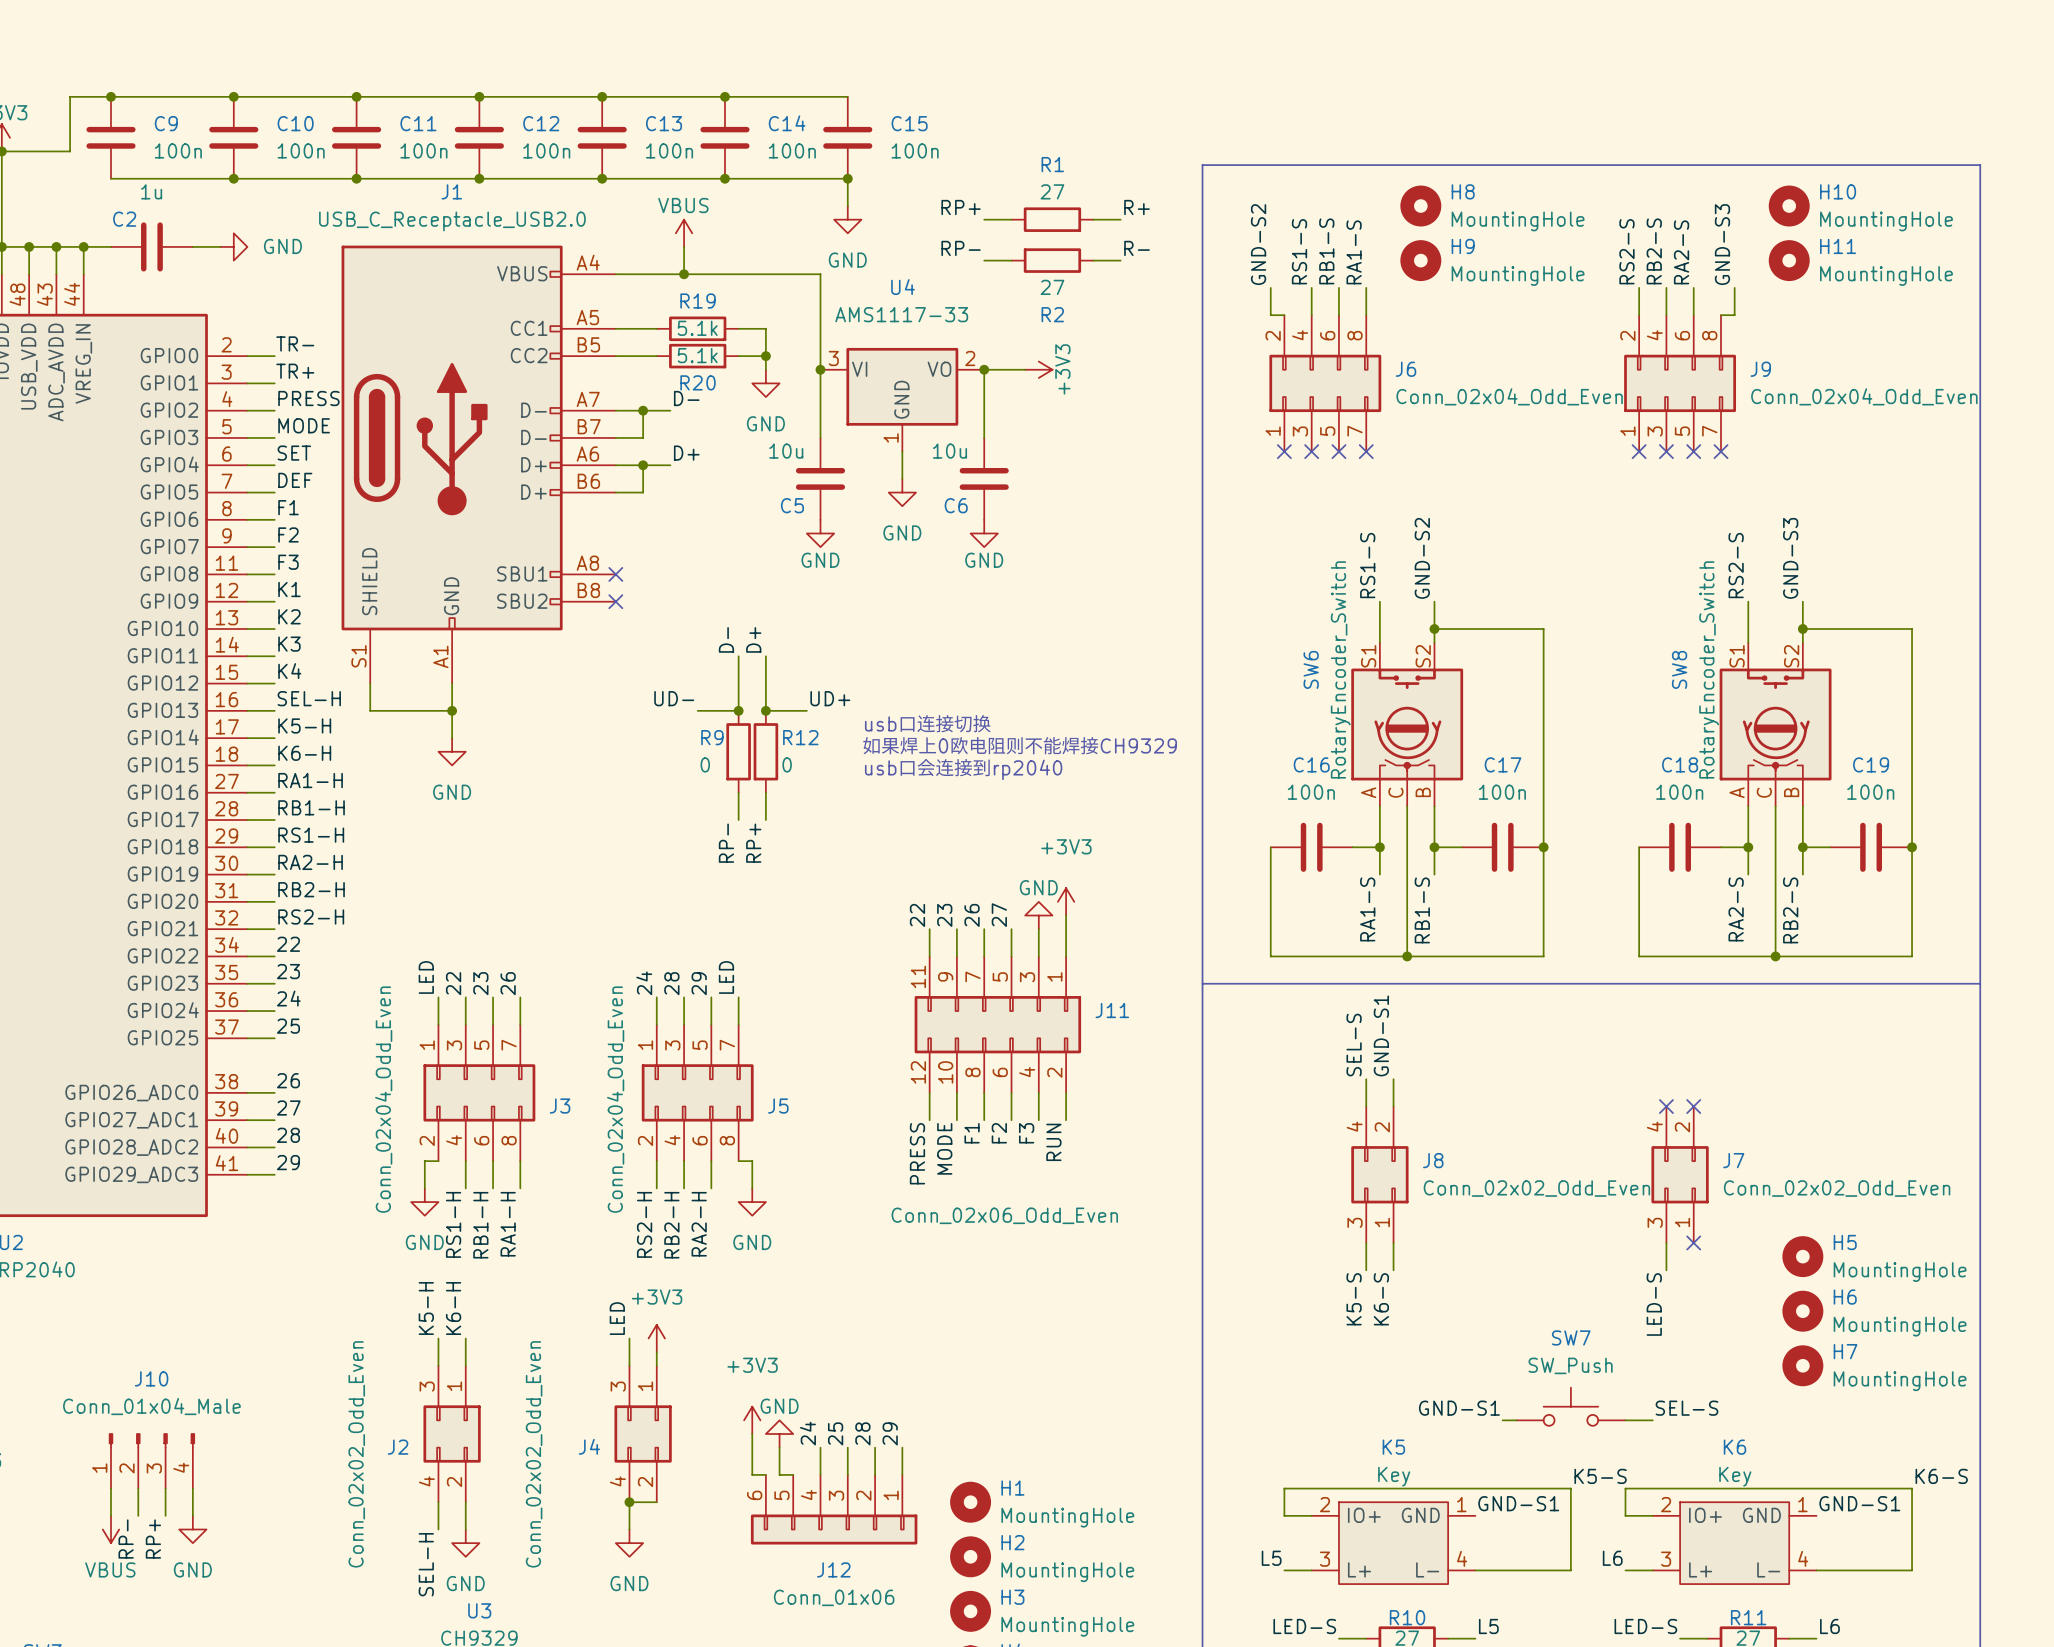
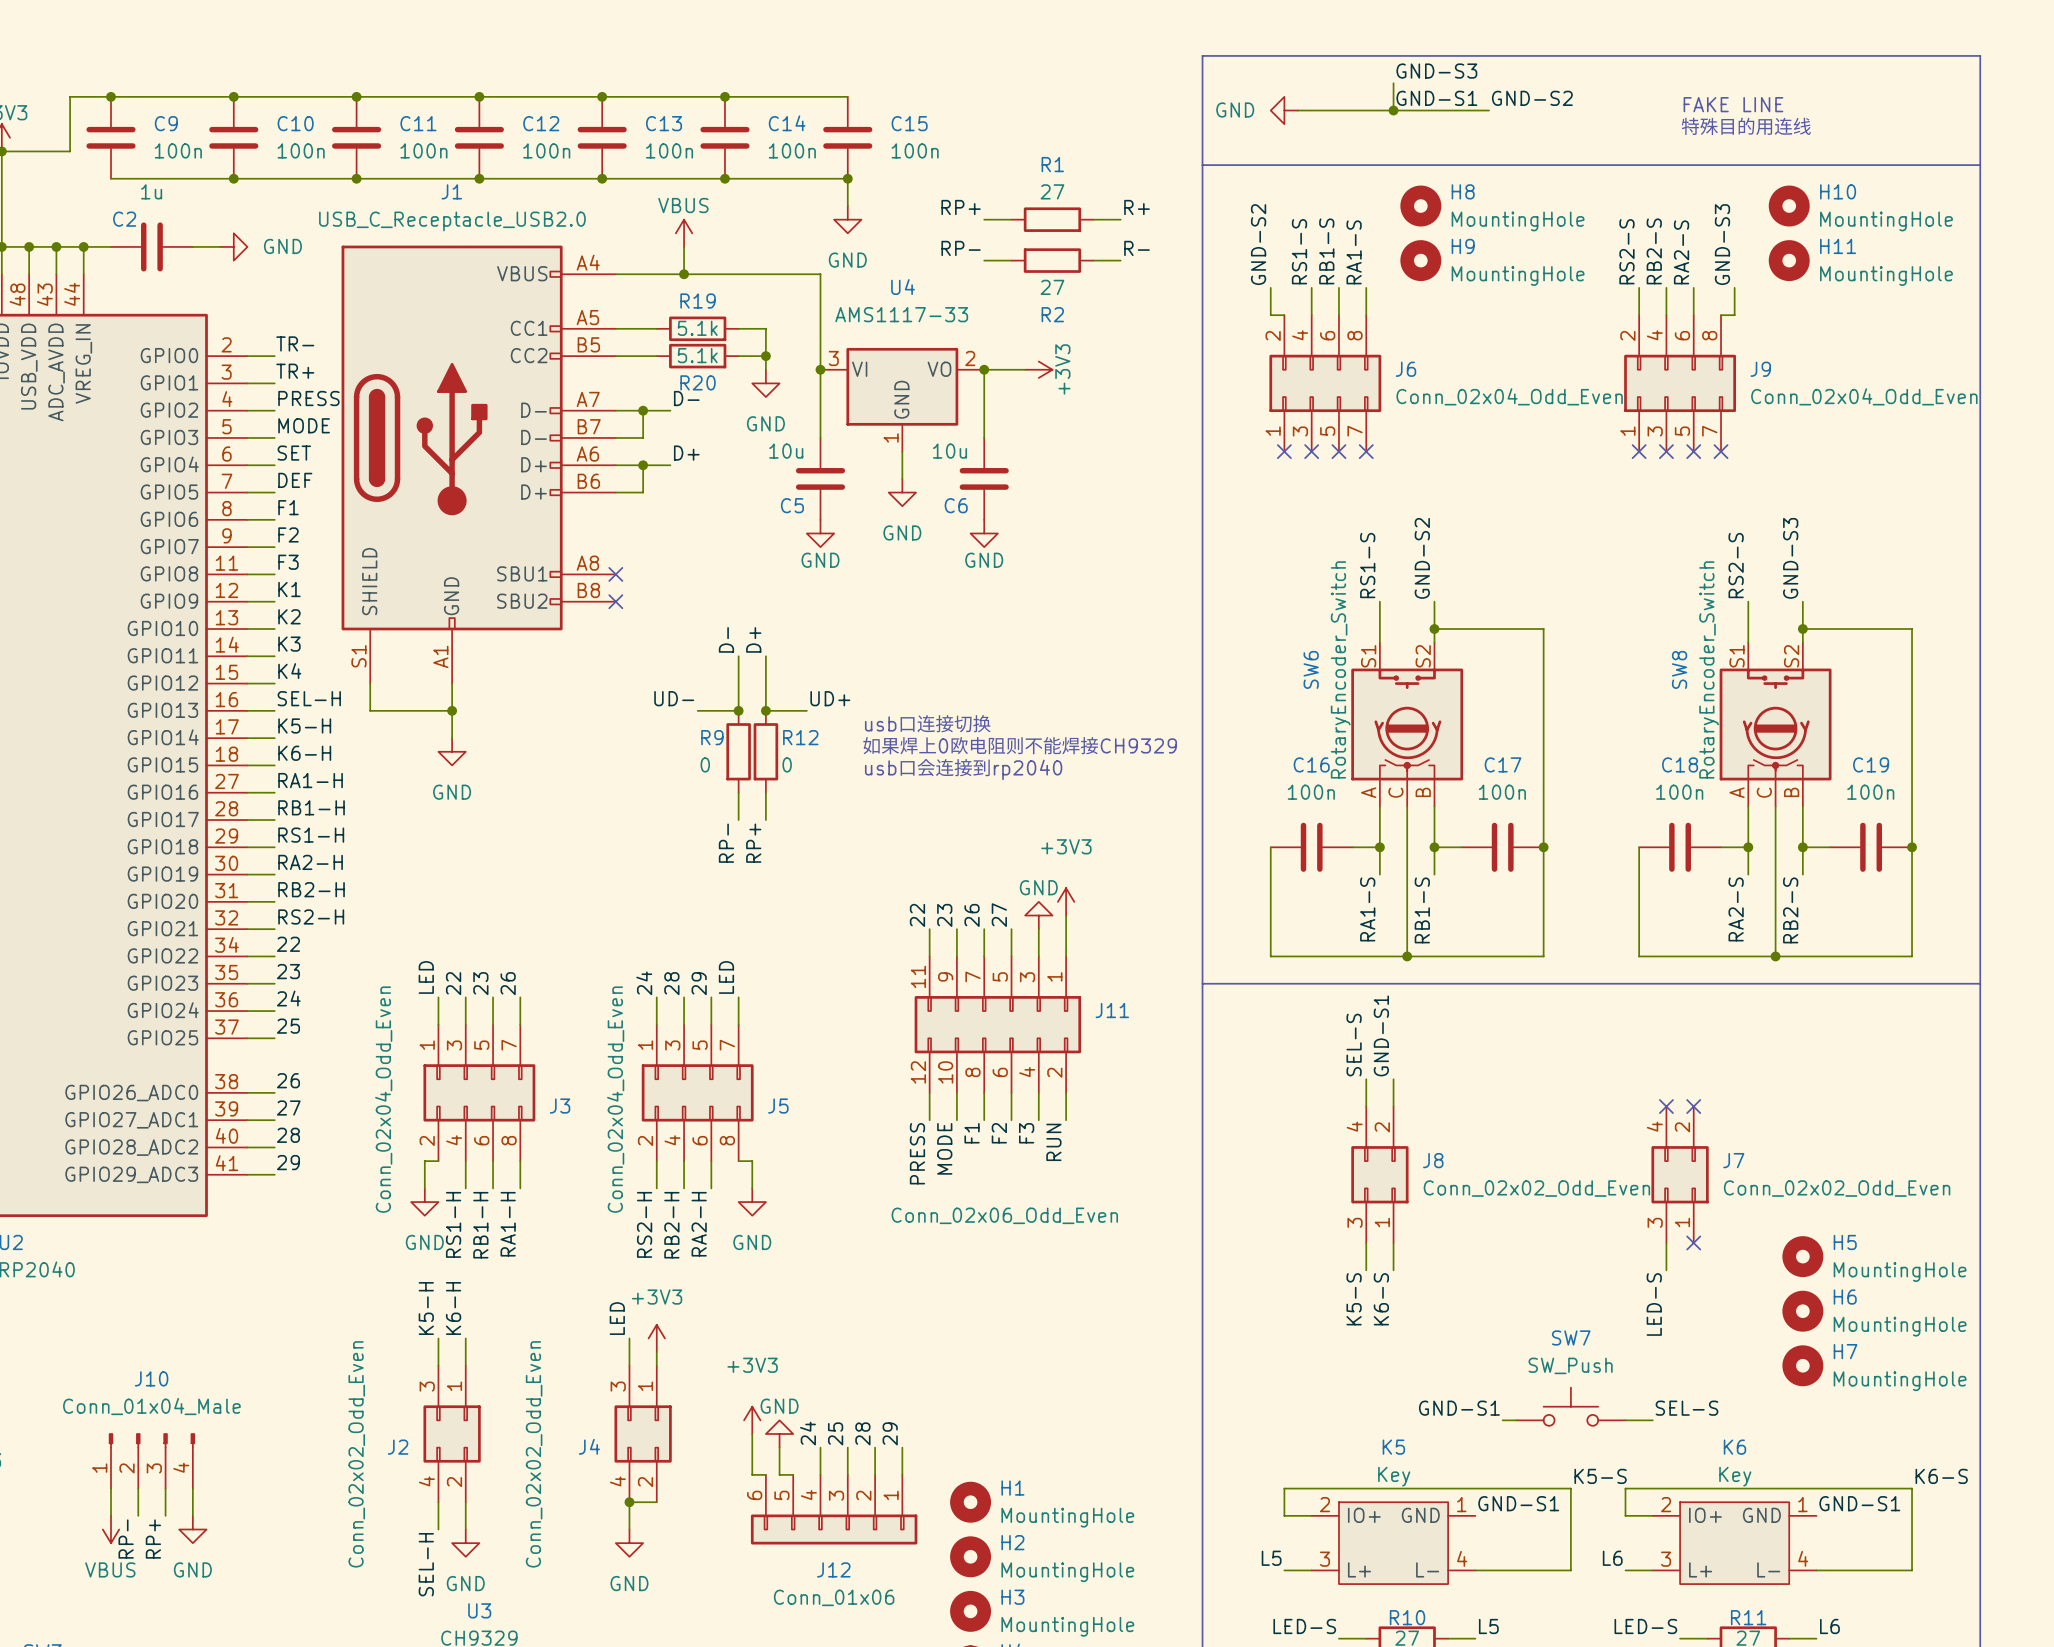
label: none -> GND-S3 (1436, 71)
wire: none -> (1393, 83) (1393, 110)
label: none -> GND-S1 (1436, 98)
label: none -> GND-S2 (1532, 98)
text: none -> FAKE LINE (1733, 104)
power symbol: none -> GND (1284, 110)
wire: none -> (1298, 110) (1489, 110)
junction: none -> (1393, 110)
text: none -> 特殊目的用连线 (1746, 126)
line: none -> (1202, 165) (1202, 55) (1980, 55) (1980, 165)

